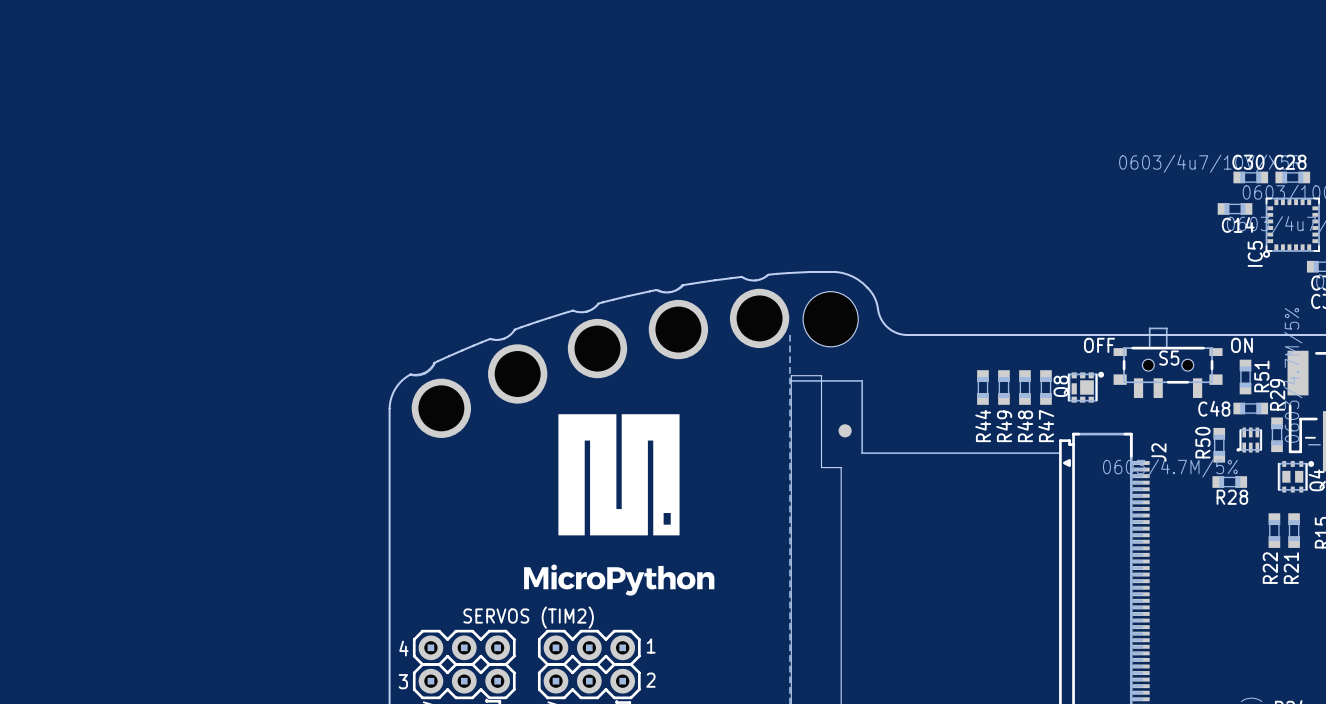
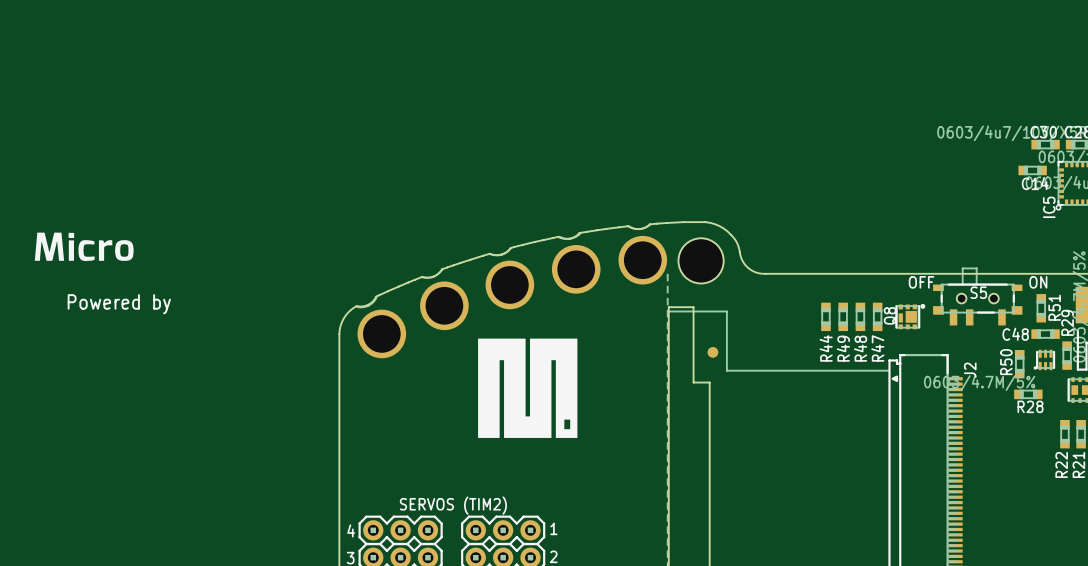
drawing: none -> [34, 232, 134, 262]
text: none -> Powered by (119, 304)
drawing: [524, 414, 715, 596] -> none
drawing: none -> [478, 338, 578, 438]

